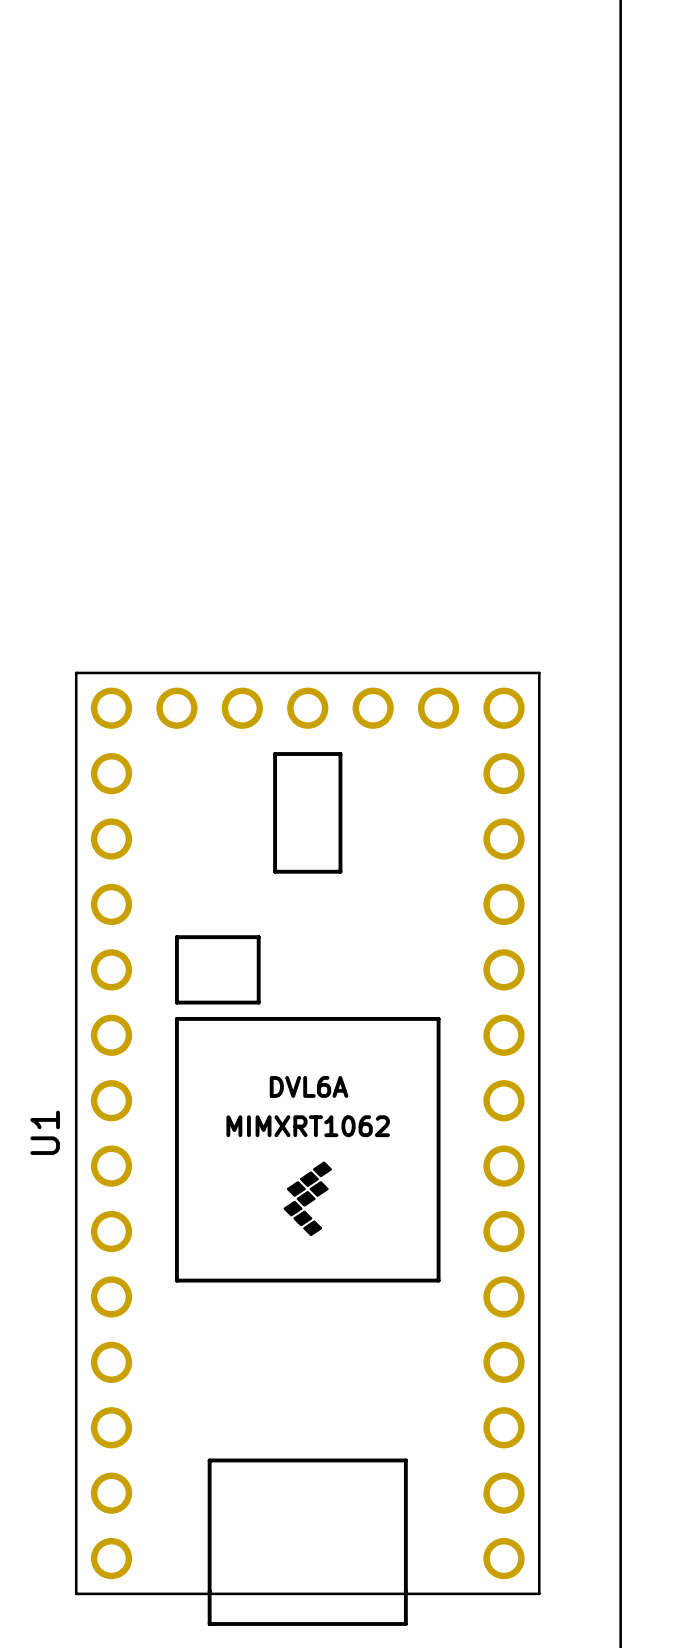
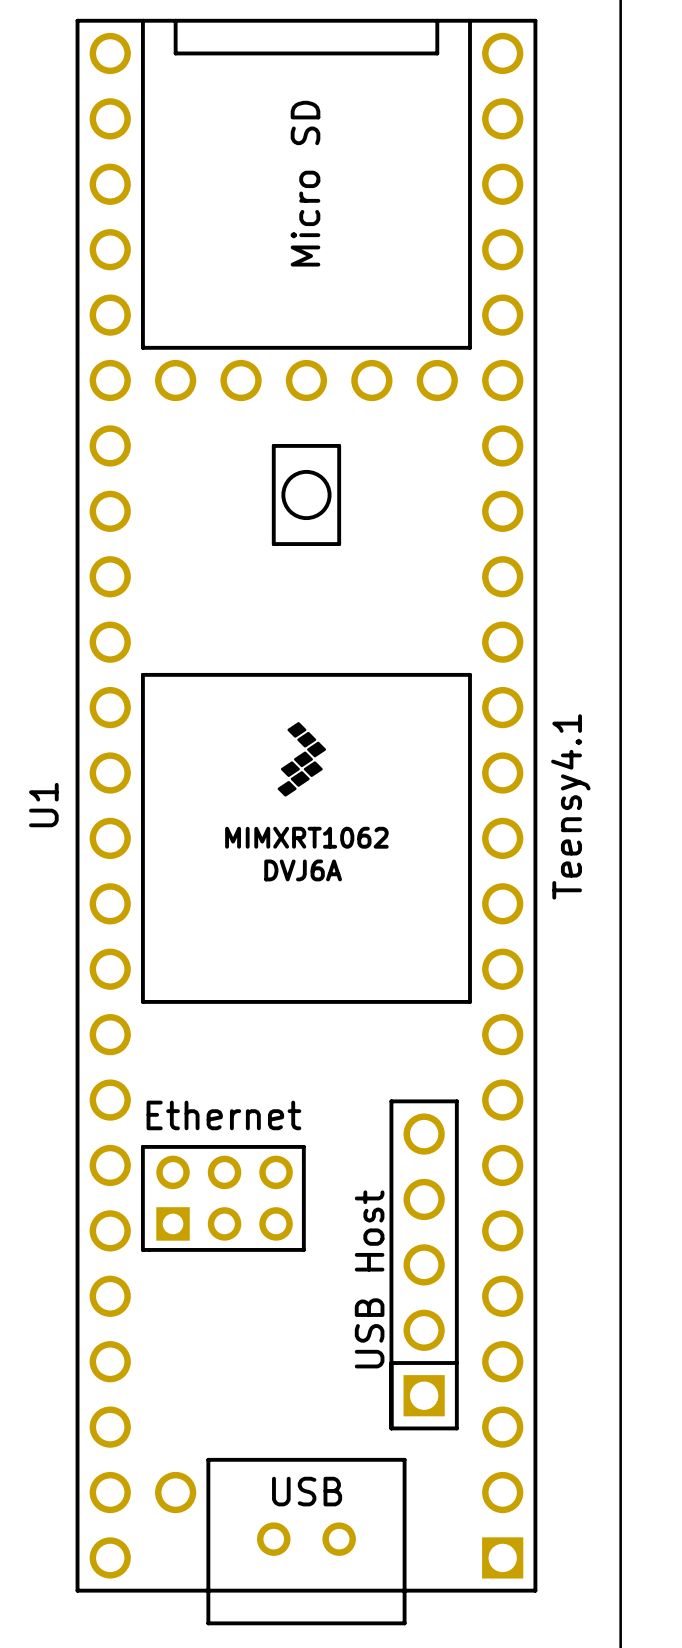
U1 footprint: [74, 671, 541, 1626] -> [75, 18, 538, 1626]
U1 value: none -> Teensy4.1 (570, 806)

